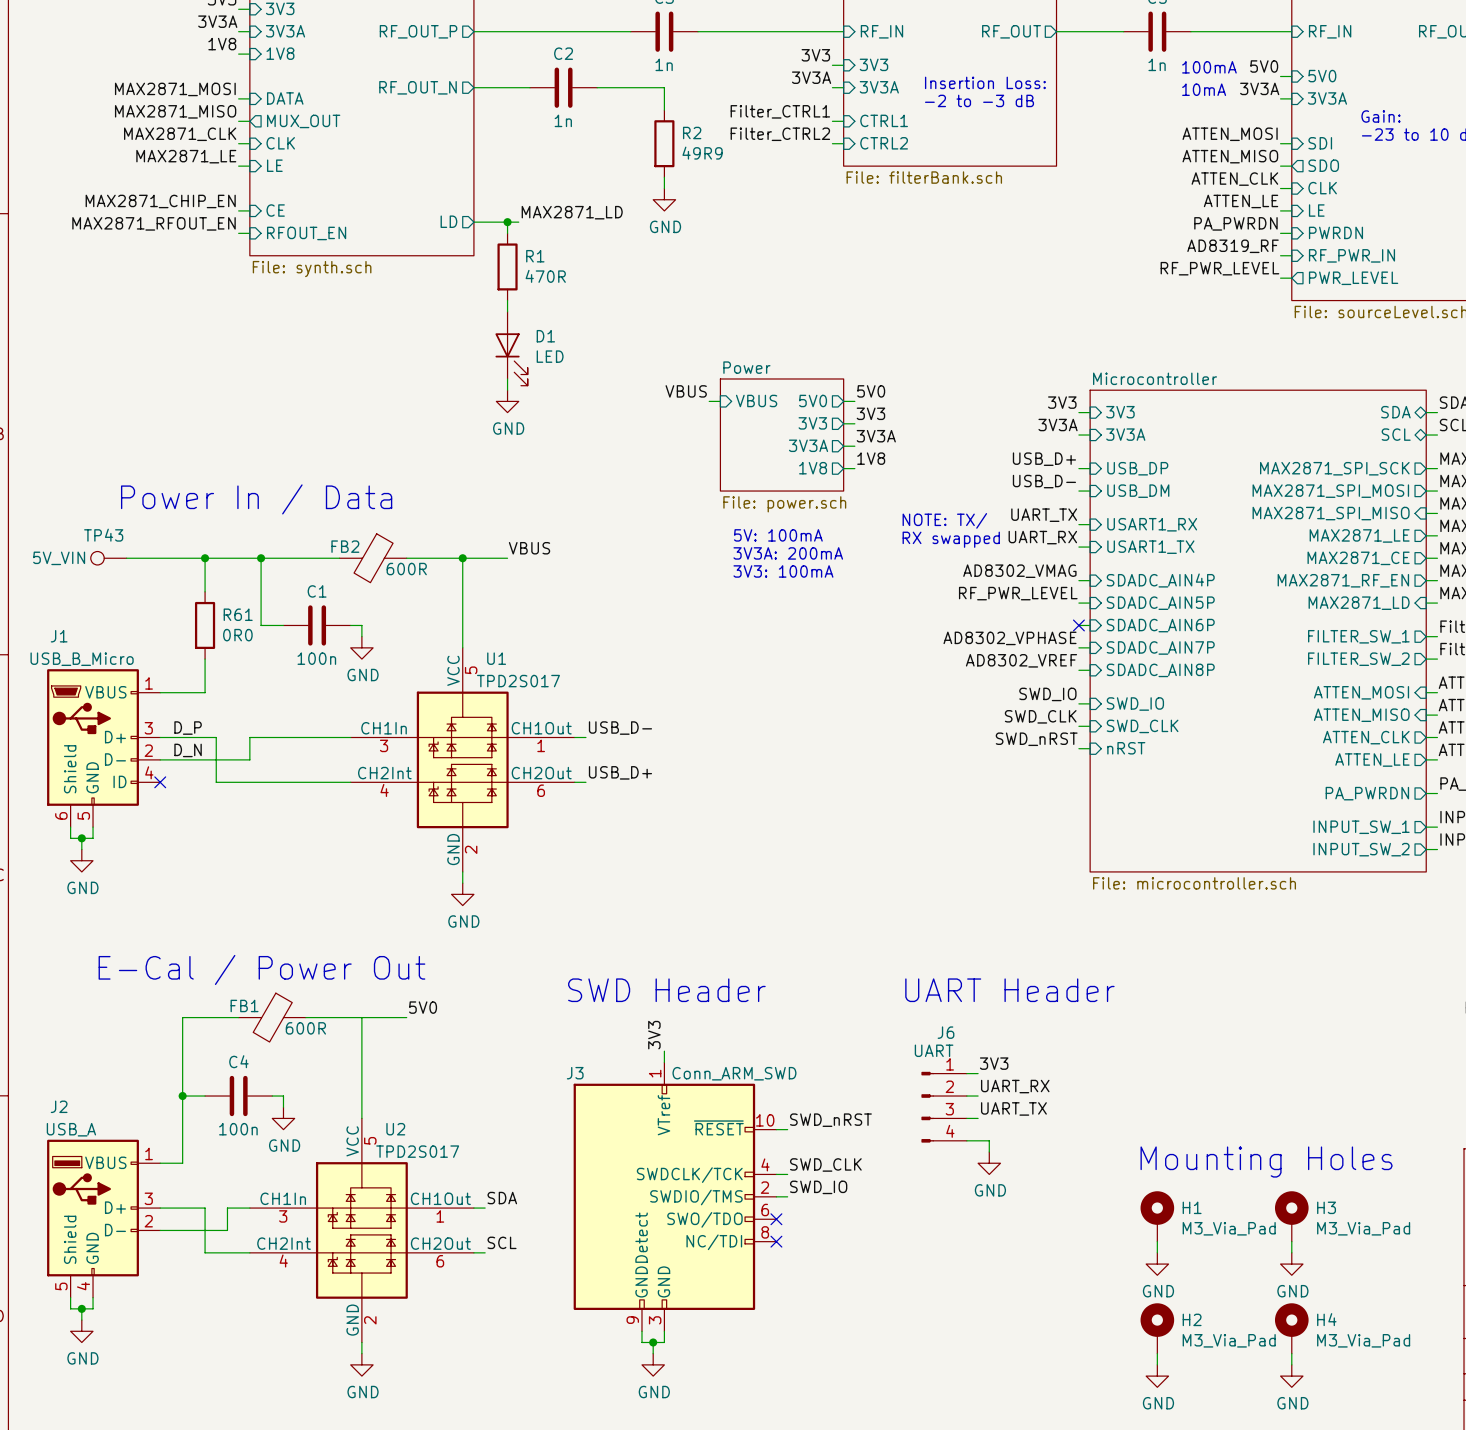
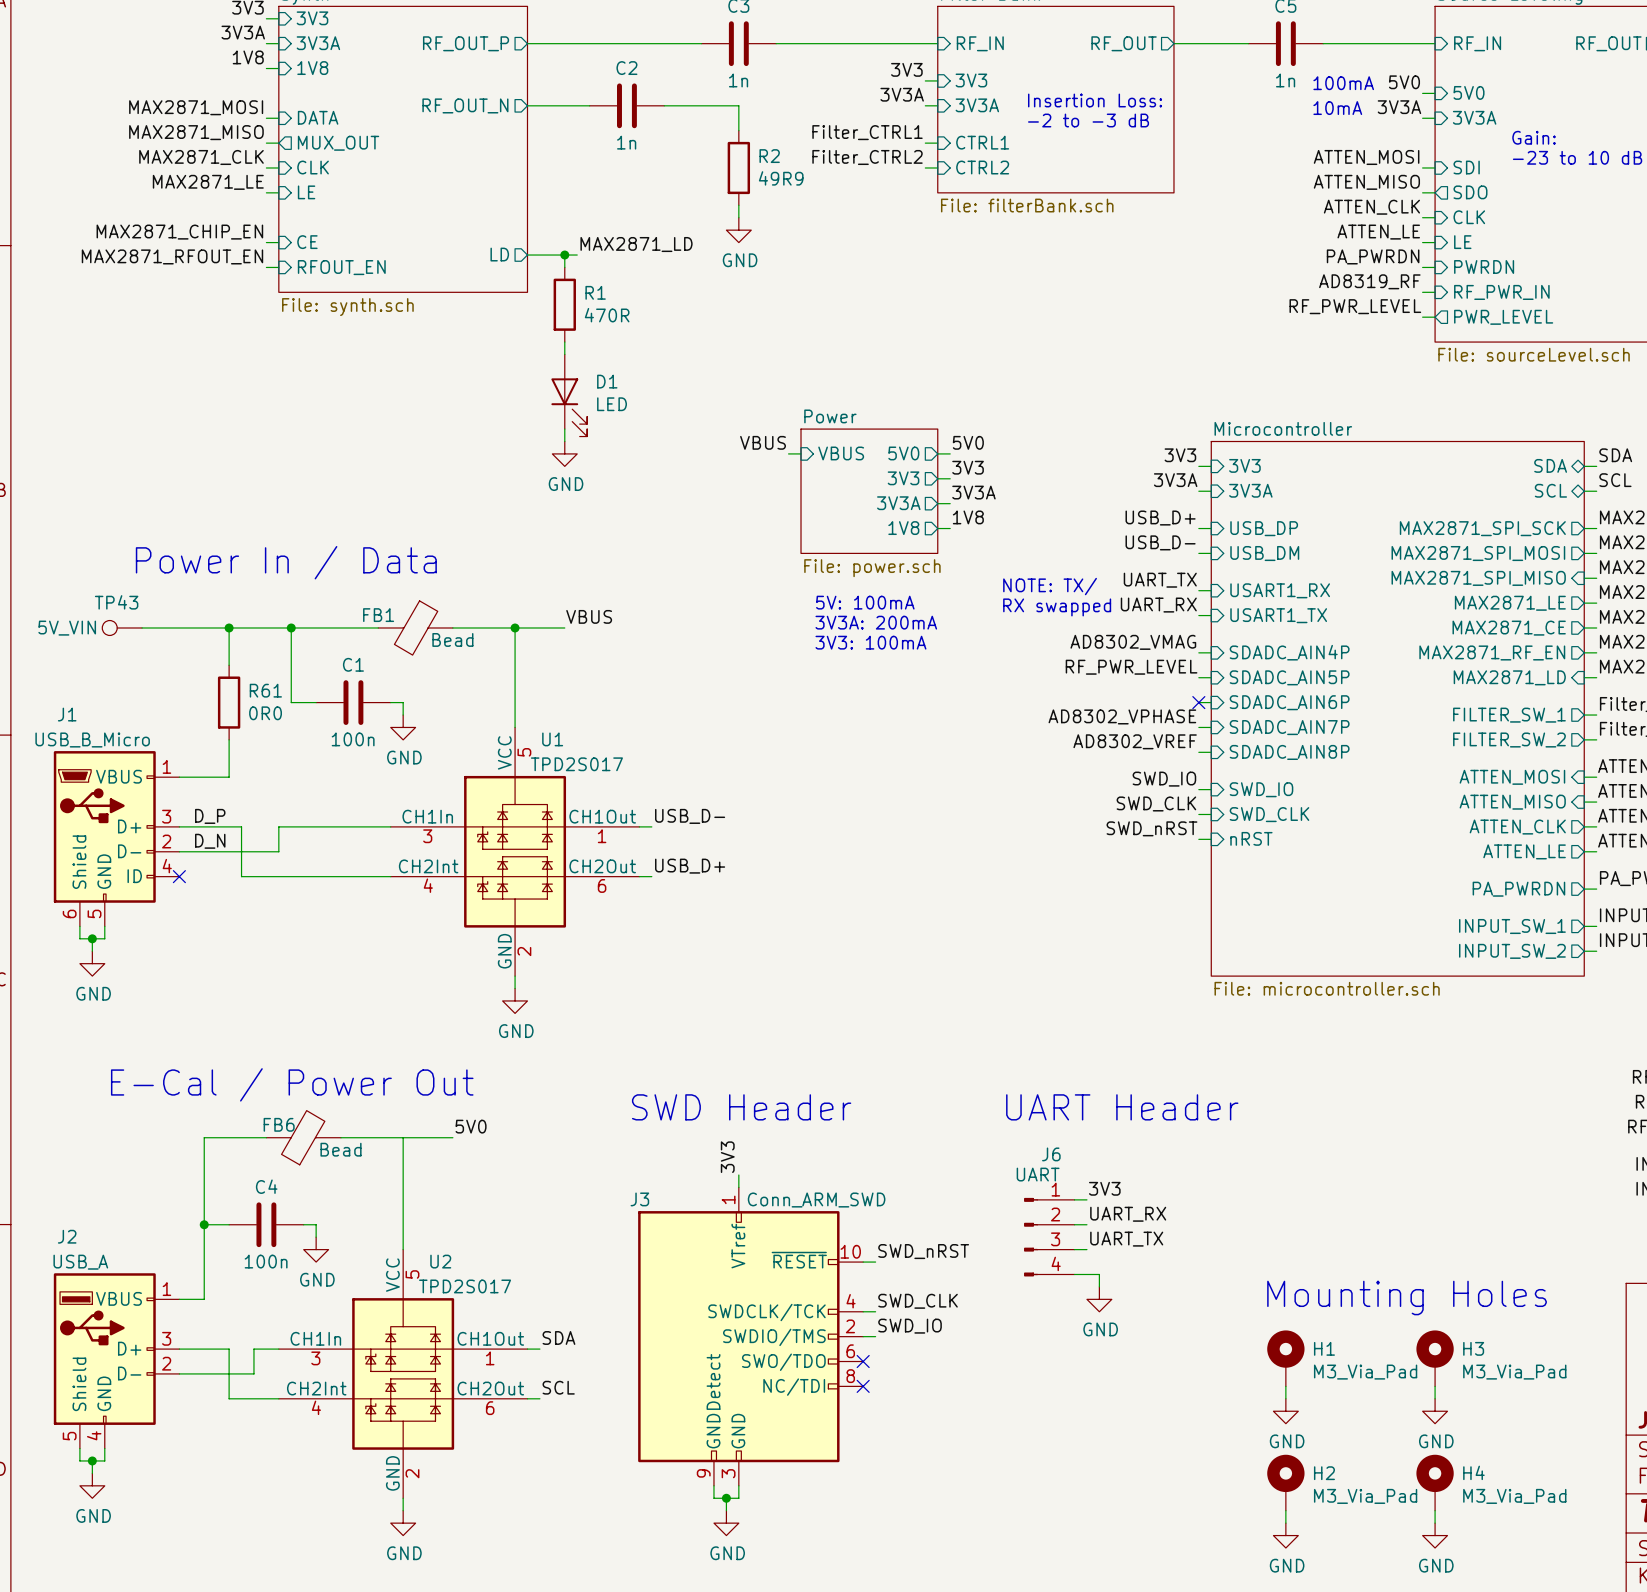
FB2 name: FB2 (345, 546) -> FB1 (378, 615)
FB2 value: 600R (406, 569) -> Bead (452, 639)
FB1: 600R (272, 1017) -> none
FB6: none -> Bead (303, 1137)

